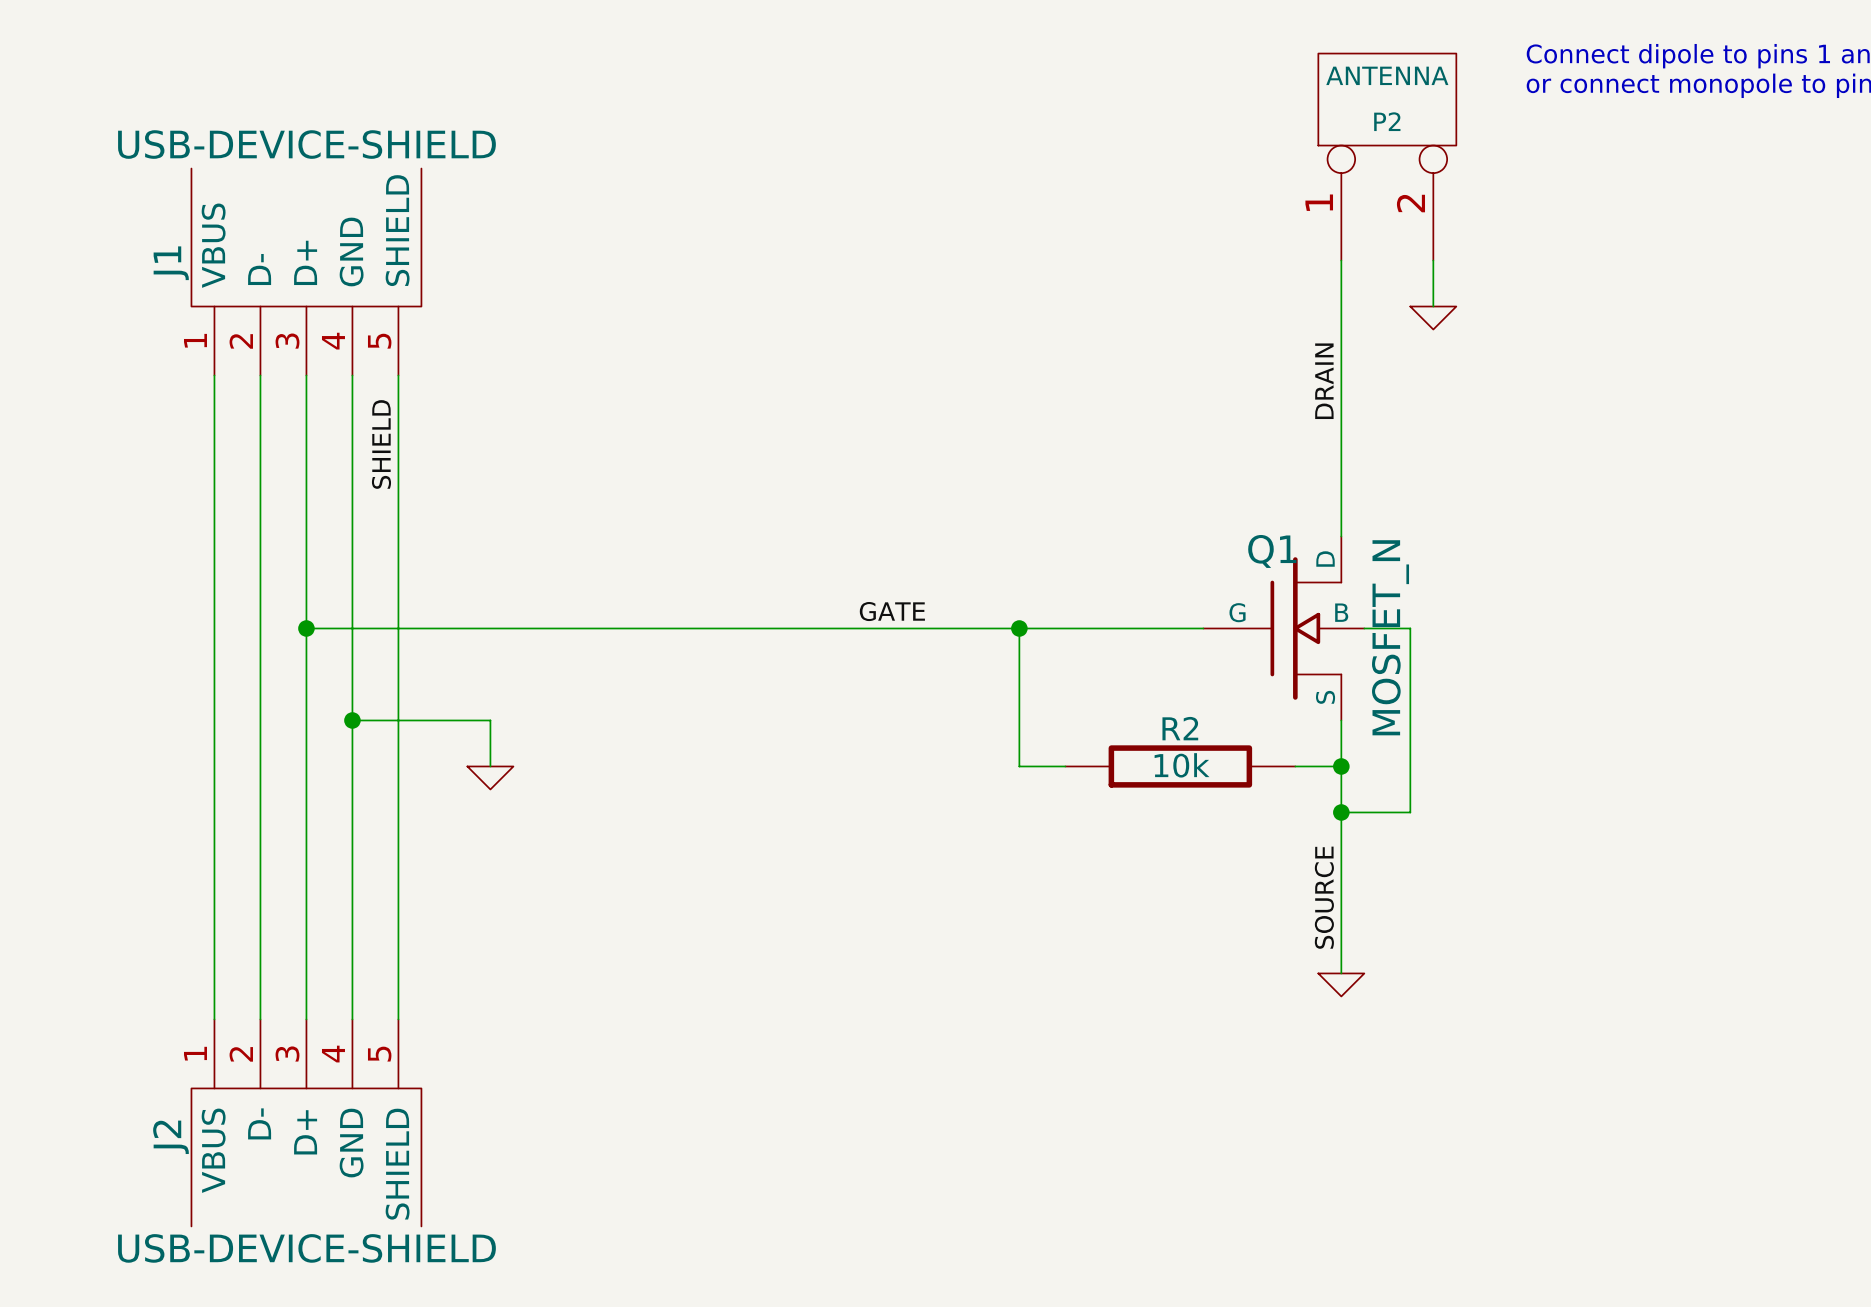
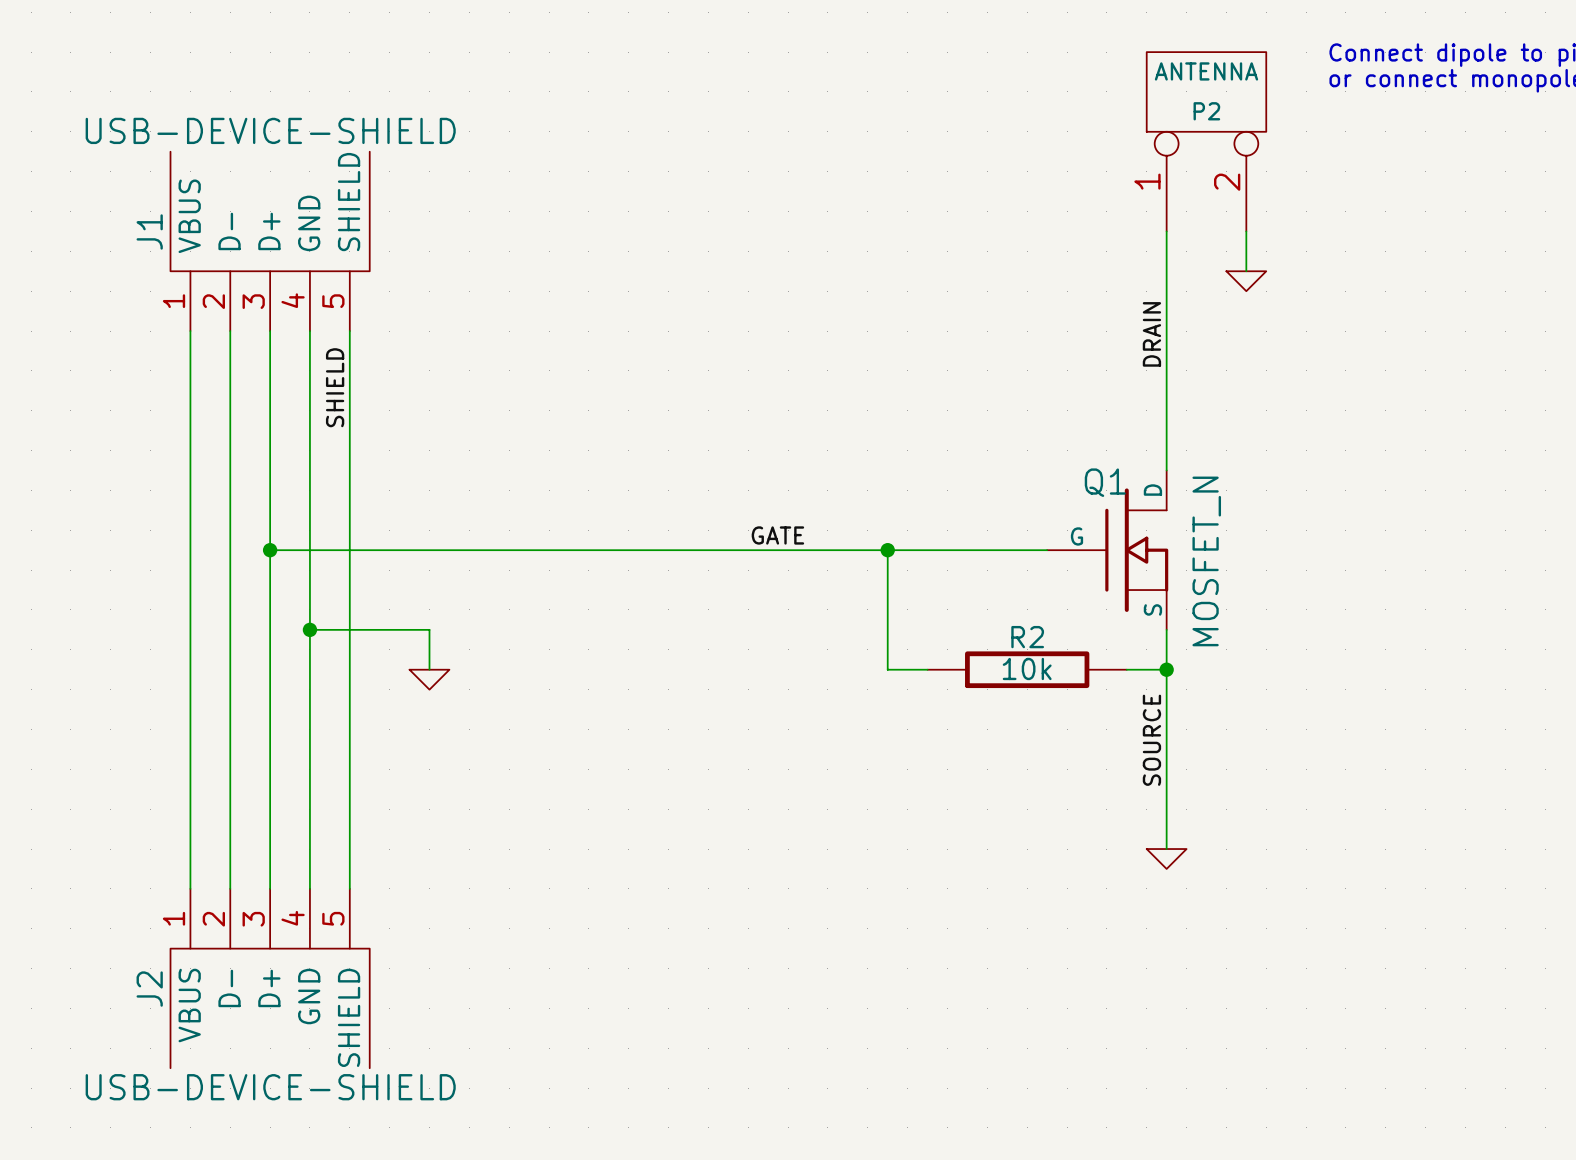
Q1 symbol: [1203, 536, 1365, 721] -> [1047, 470, 1169, 630]
wire: (1364, 628) (1410, 628) (1410, 812) (1341, 812) -> none
junction: (1341, 812) -> none
label position: SOURCE (1324, 897) -> SOURCE (1151, 740)

